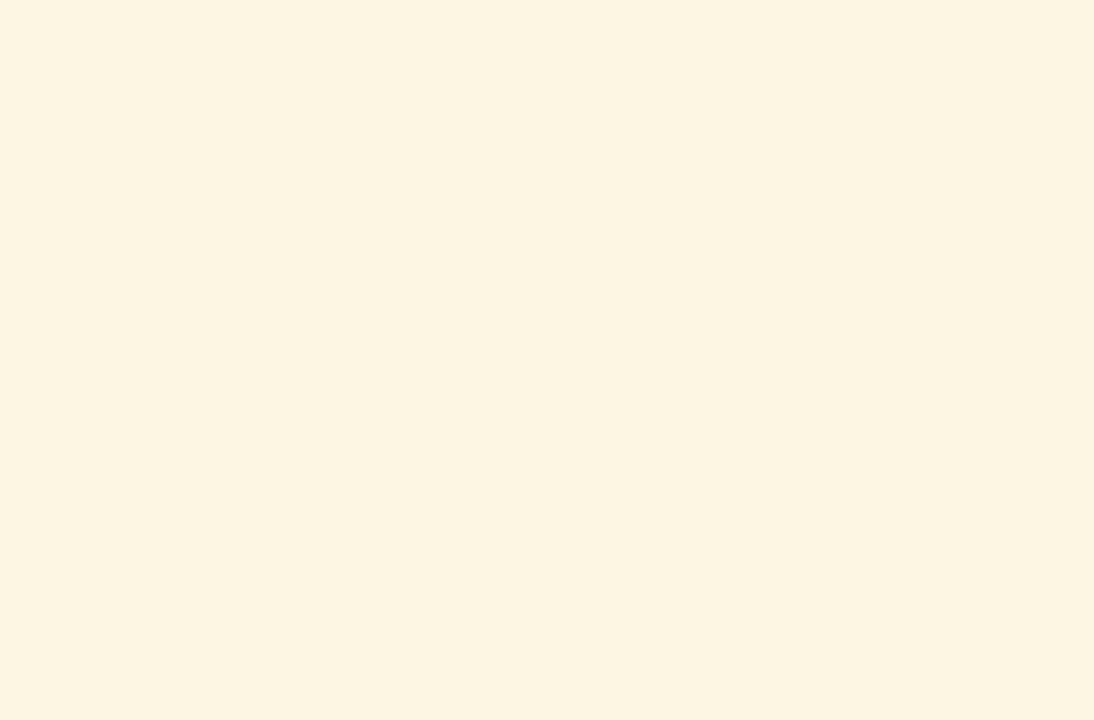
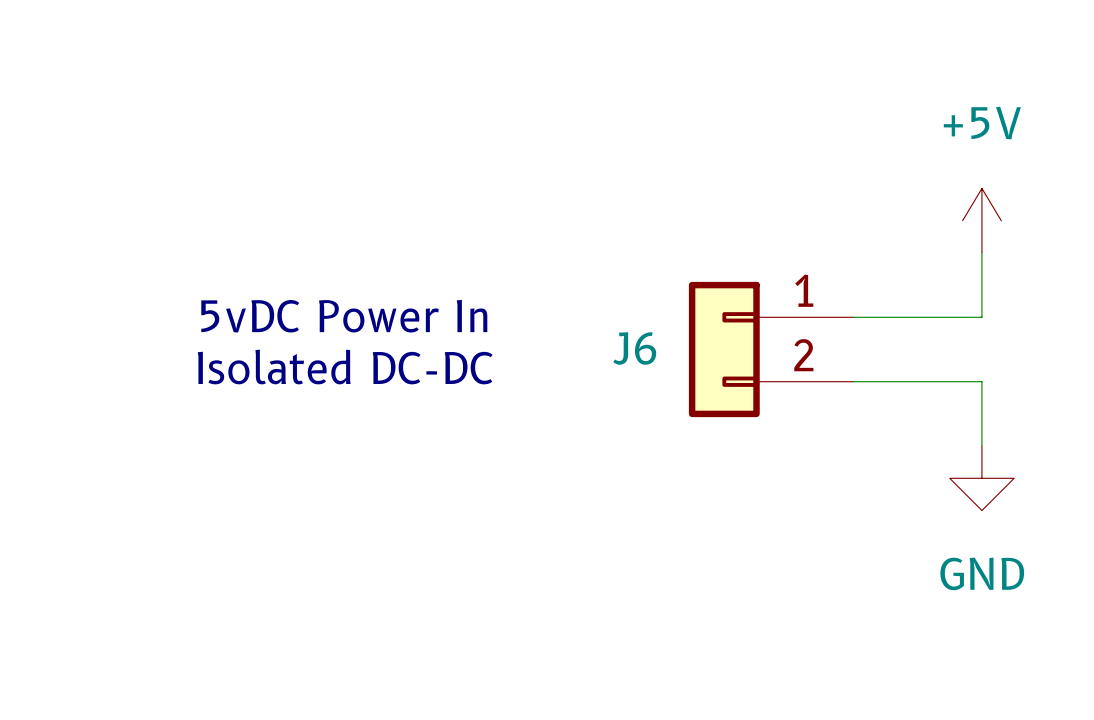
power symbol: none -> +5V (981, 220)
wire: none -> (981, 252) (981, 317) (853, 317)
text: none -> 5vDC Power In (344, 316)
J6: none -> (771, 349)
text: none -> Isolated DC-DC (345, 367)
wire: none -> (853, 381) (981, 381) (981, 446)
power symbol: none -> GND (981, 478)

